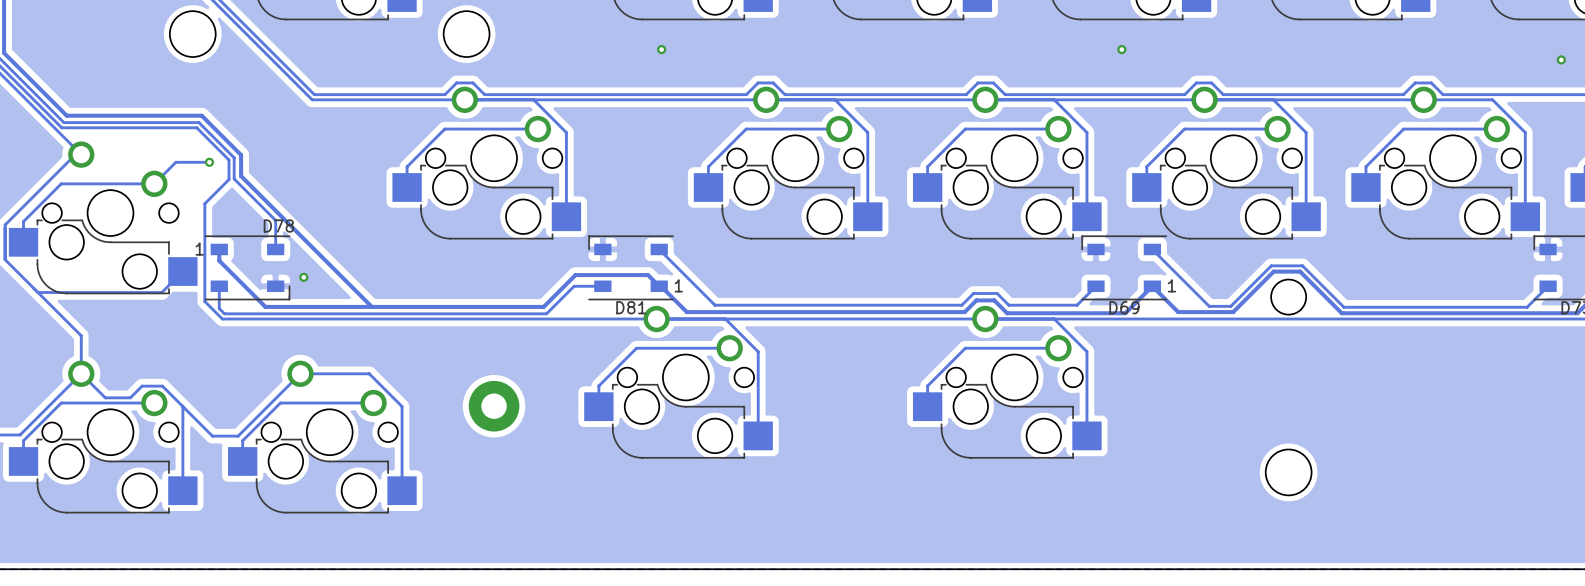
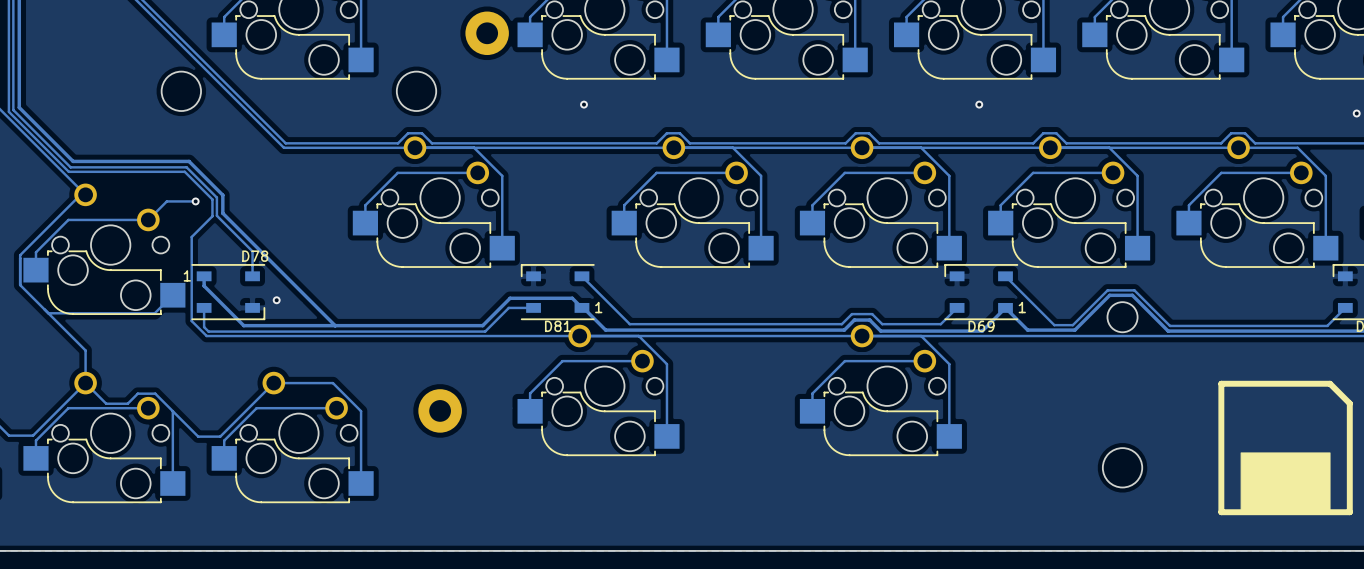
line: none -> (1330, 383) (1349, 403) (1349, 512) (1221, 512) (1221, 383) (1330, 383)
drawing: none -> [1240, 452, 1331, 513]

